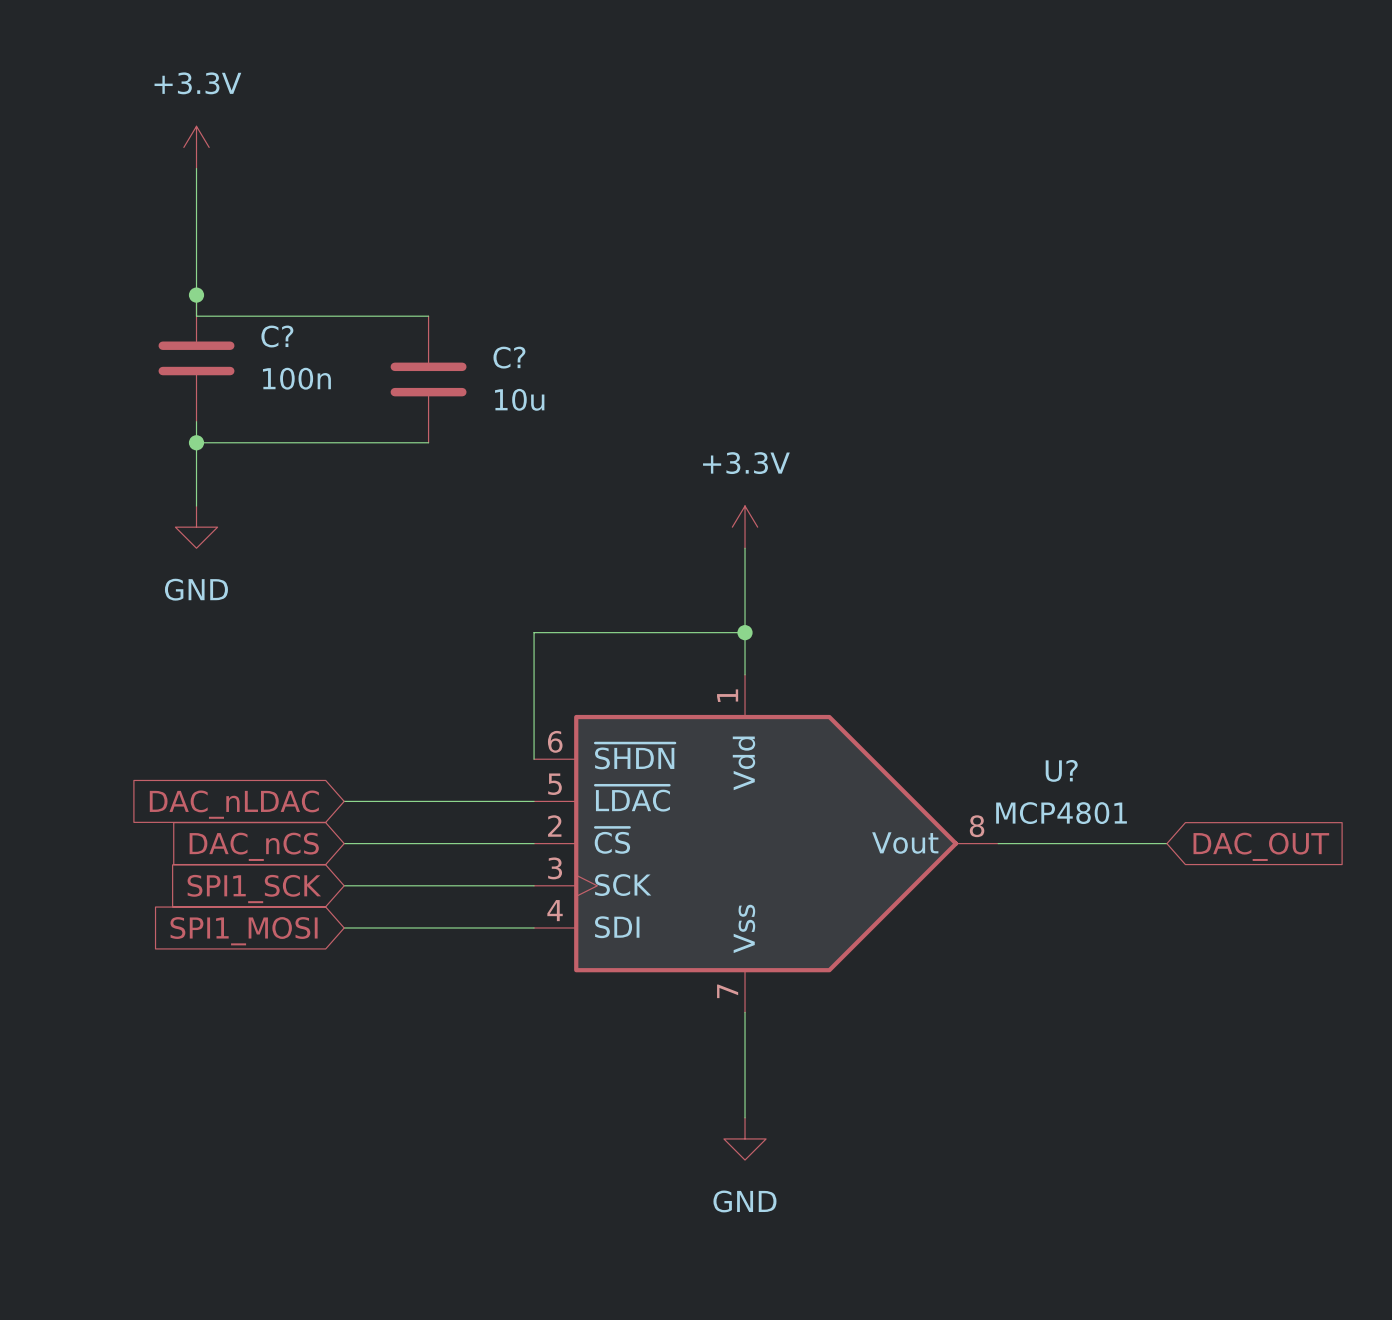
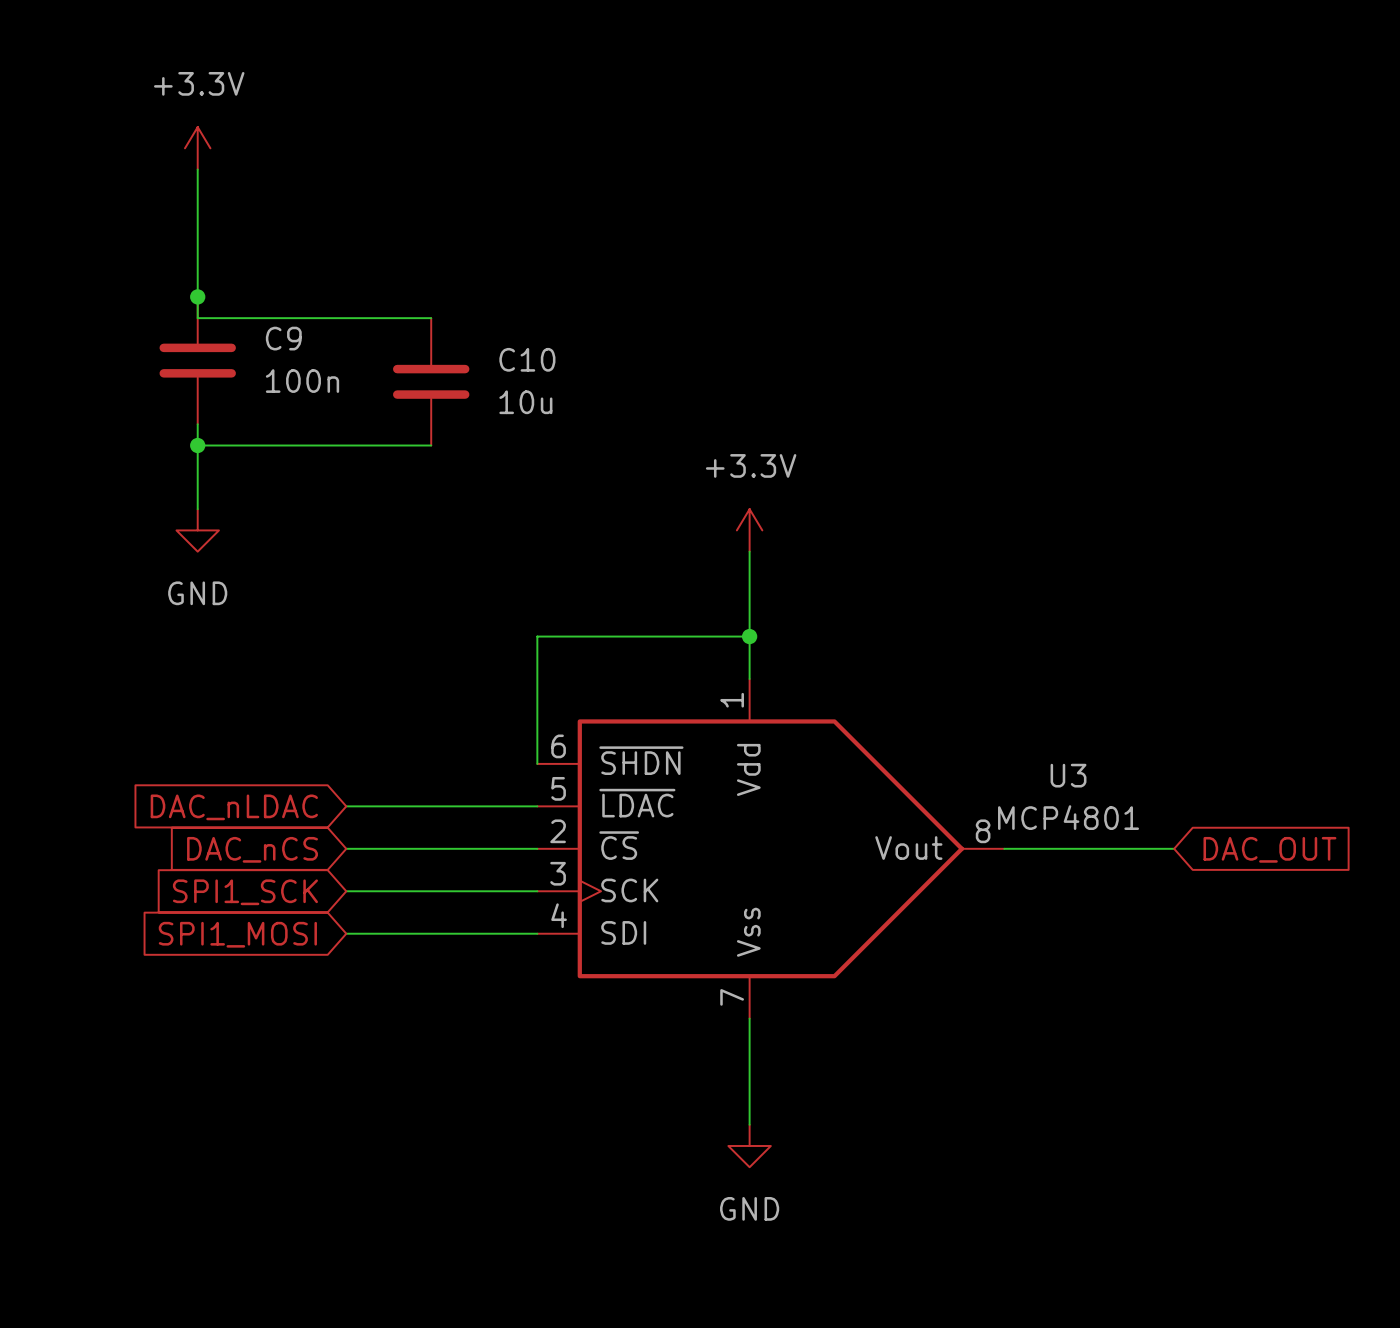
C? name: C? (277, 336) -> C9 (283, 338)
C? name: C? (509, 357) -> C10 (527, 359)
U? name: U? (1061, 770) -> U3 (1068, 775)

